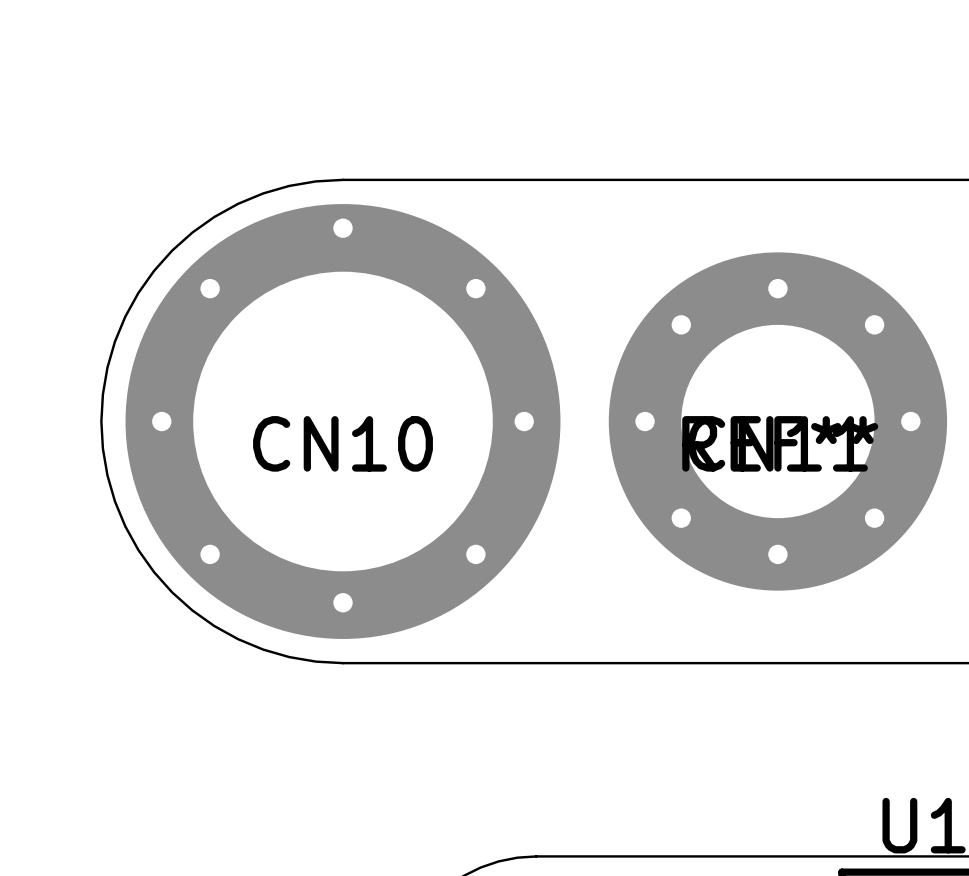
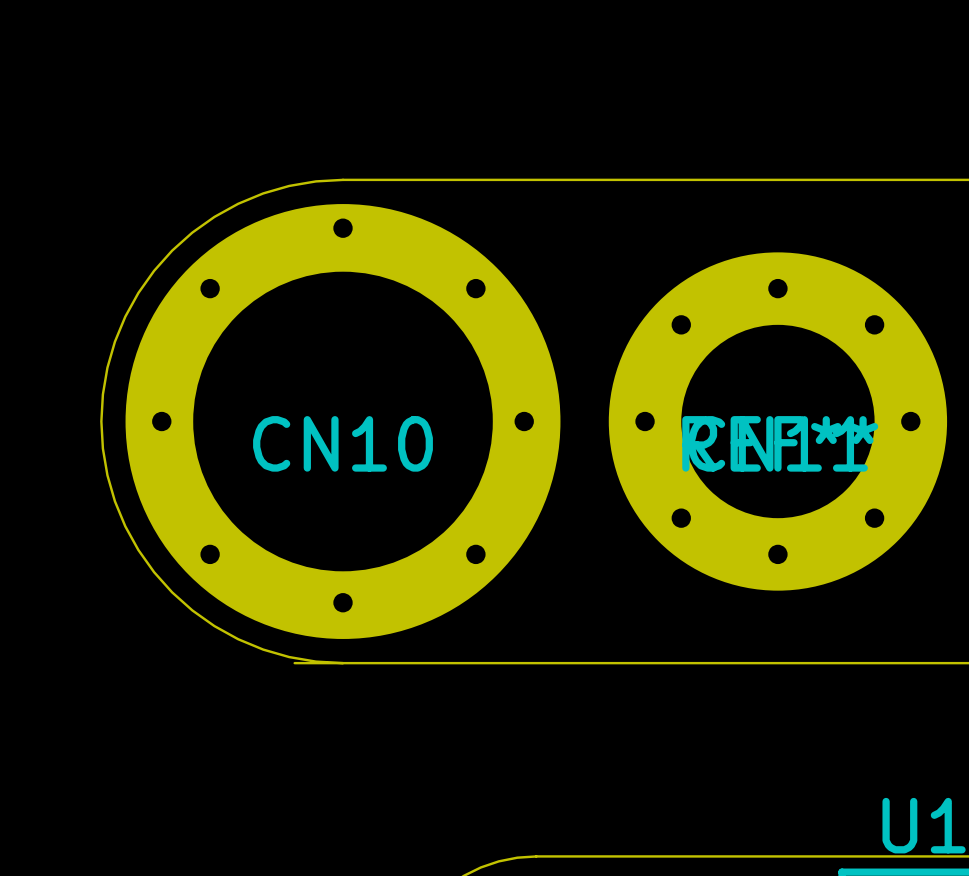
board edge: none -> (294, 663) (343, 663)

